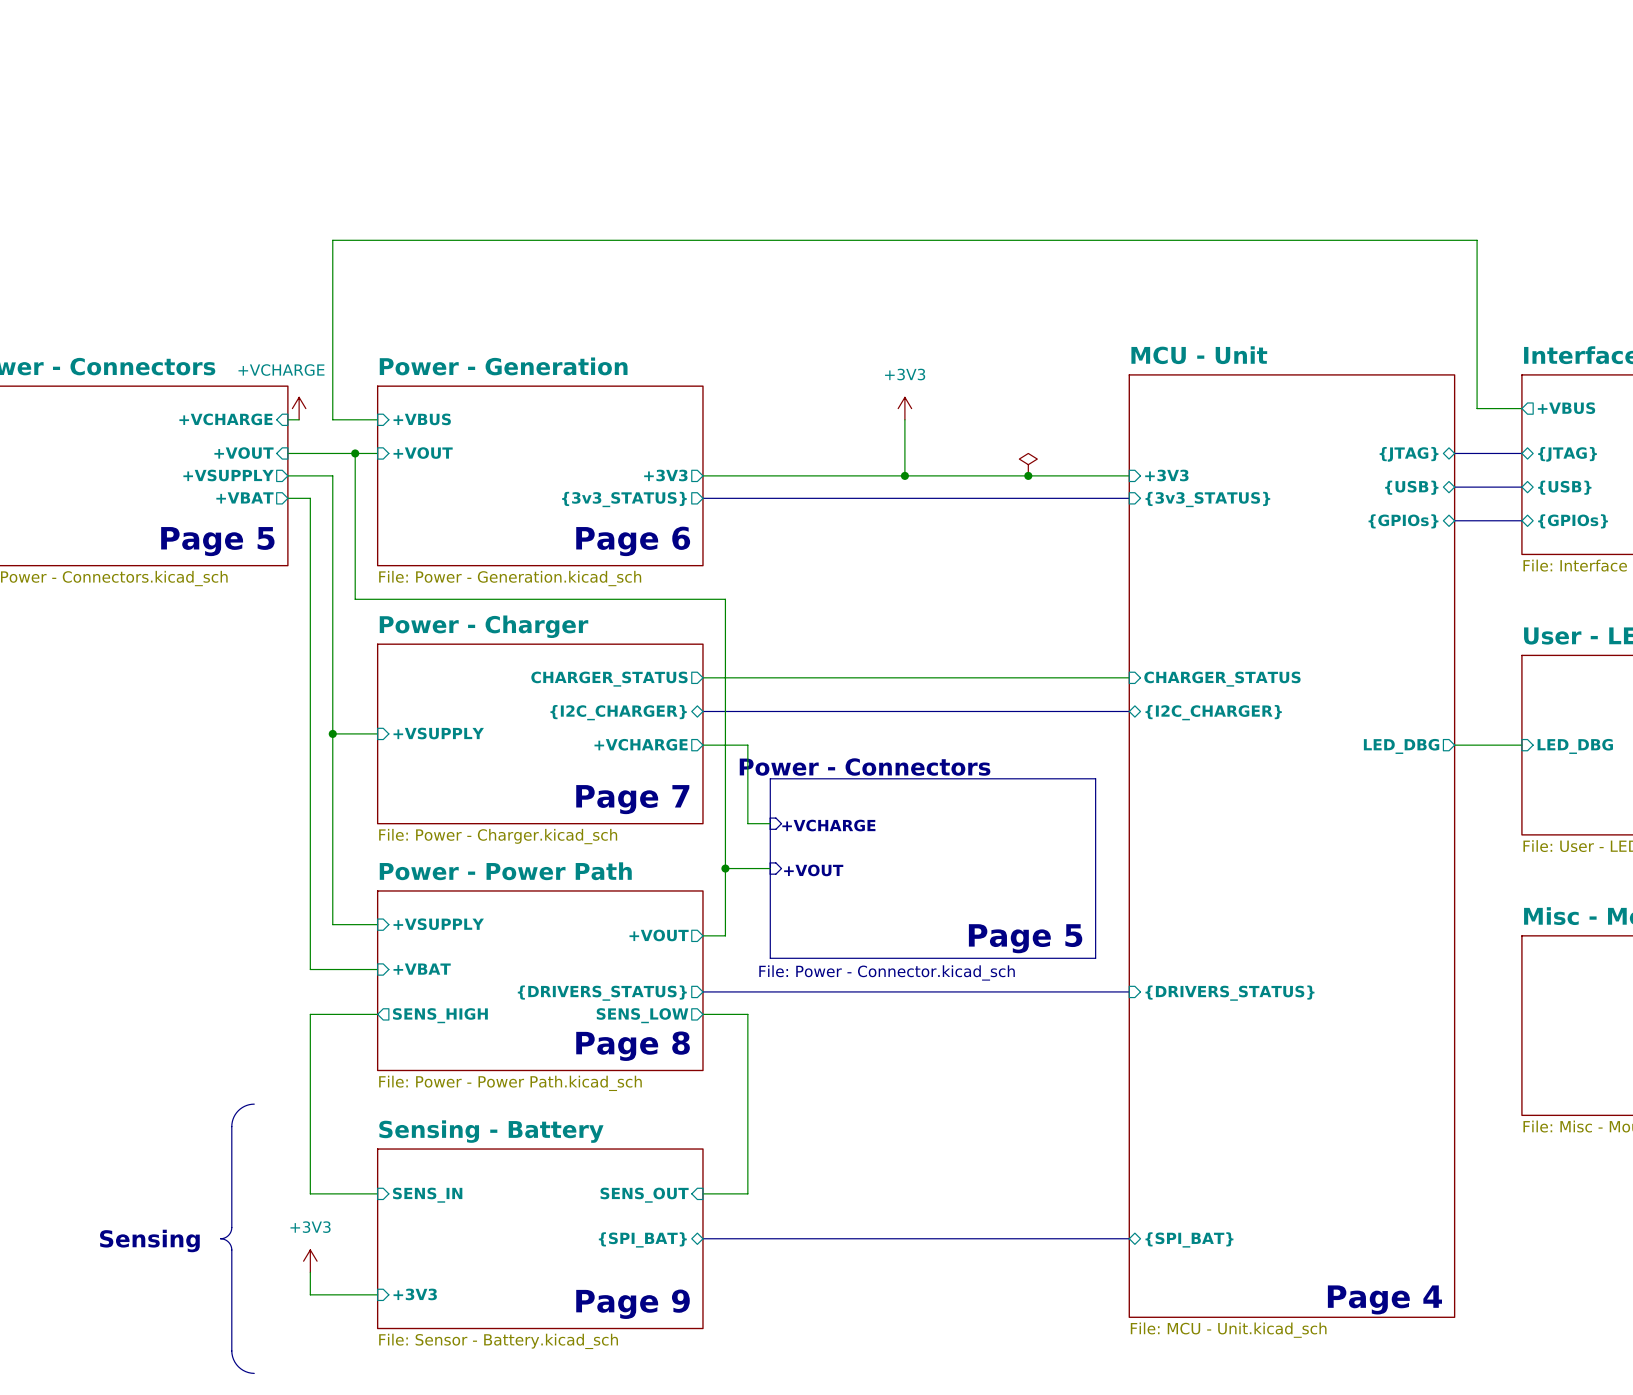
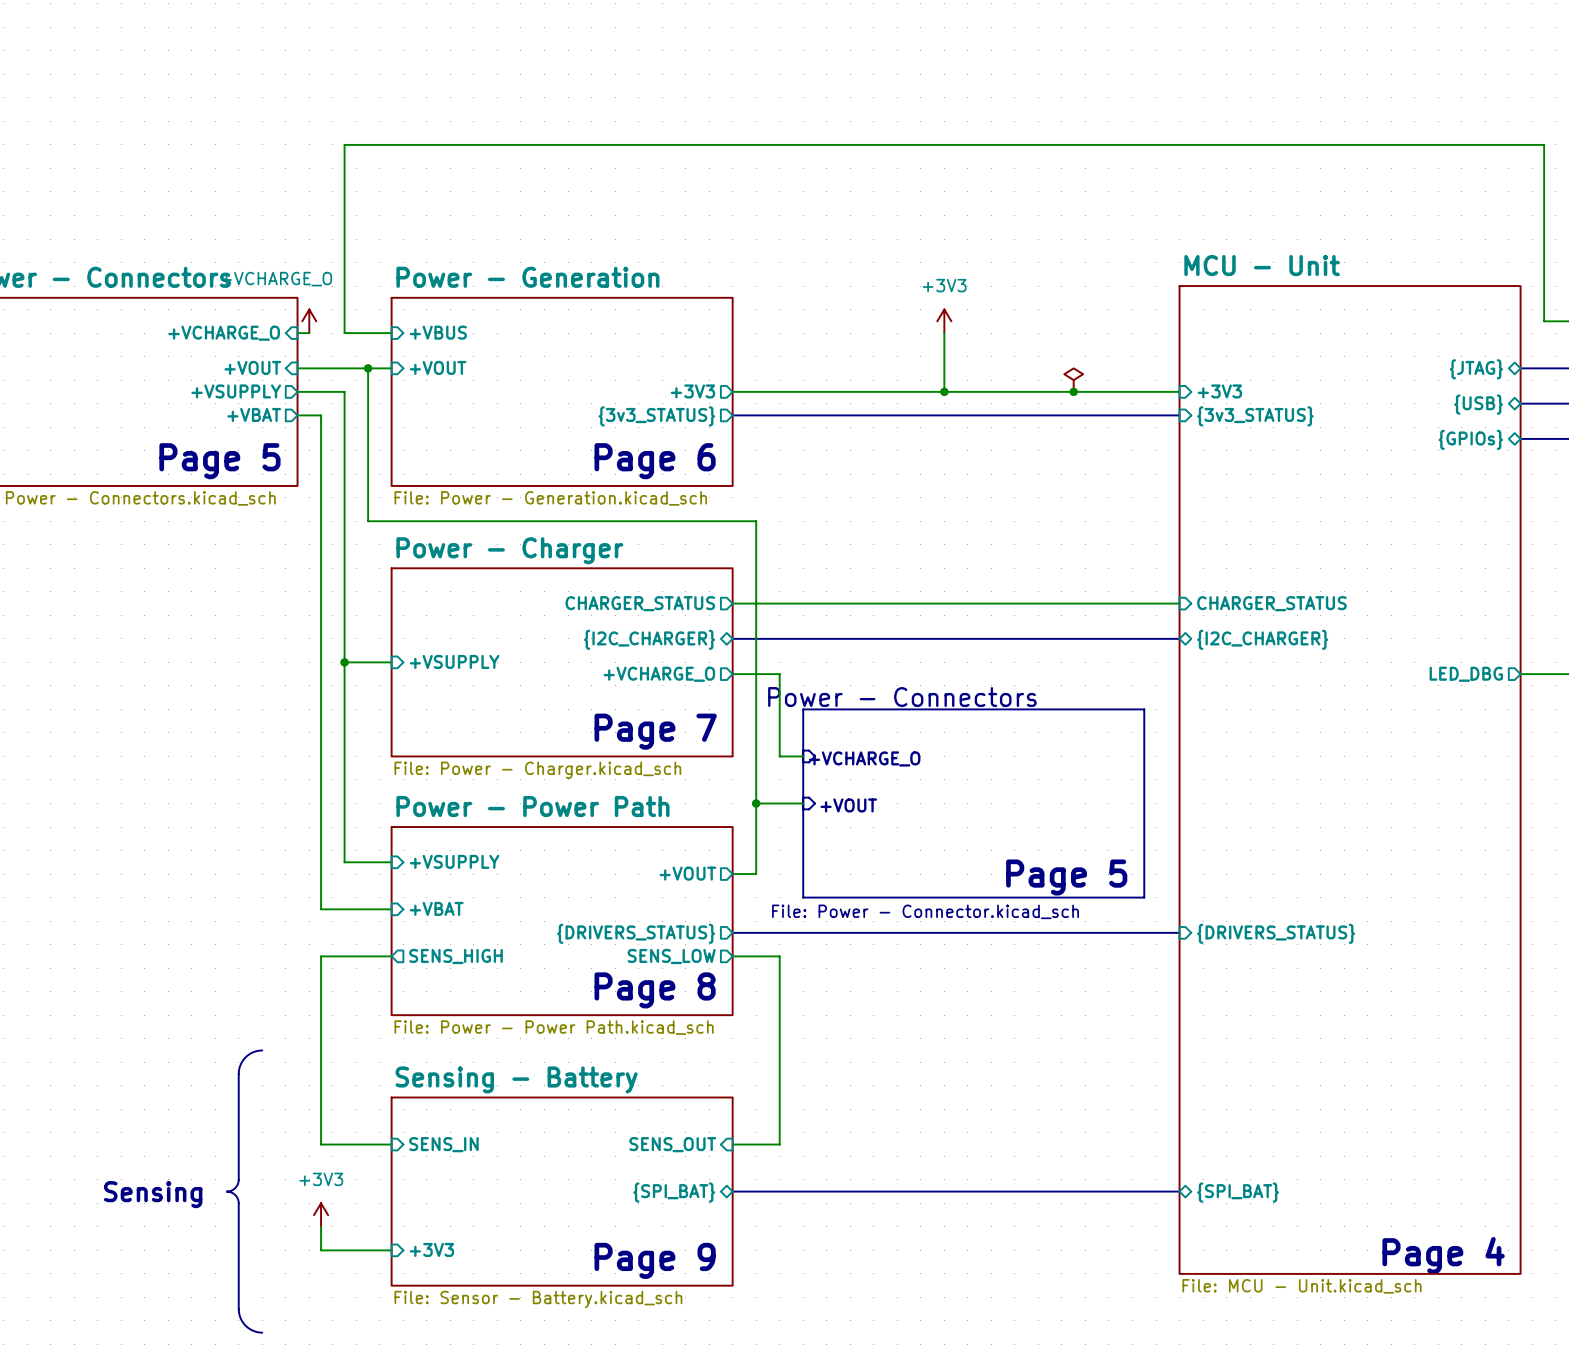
power symbol: +VCHARGE (299, 408) -> +VCHARGE_O (309, 321)
sheet pin: +VCHARGE (225, 419) -> +VCHARGE_O (224, 333)
sheet pin: +VCHARGE (641, 744) -> +VCHARGE_O (659, 674)
text: +VCHARGE (828, 825) -> +VCHARGE_O (864, 758)

